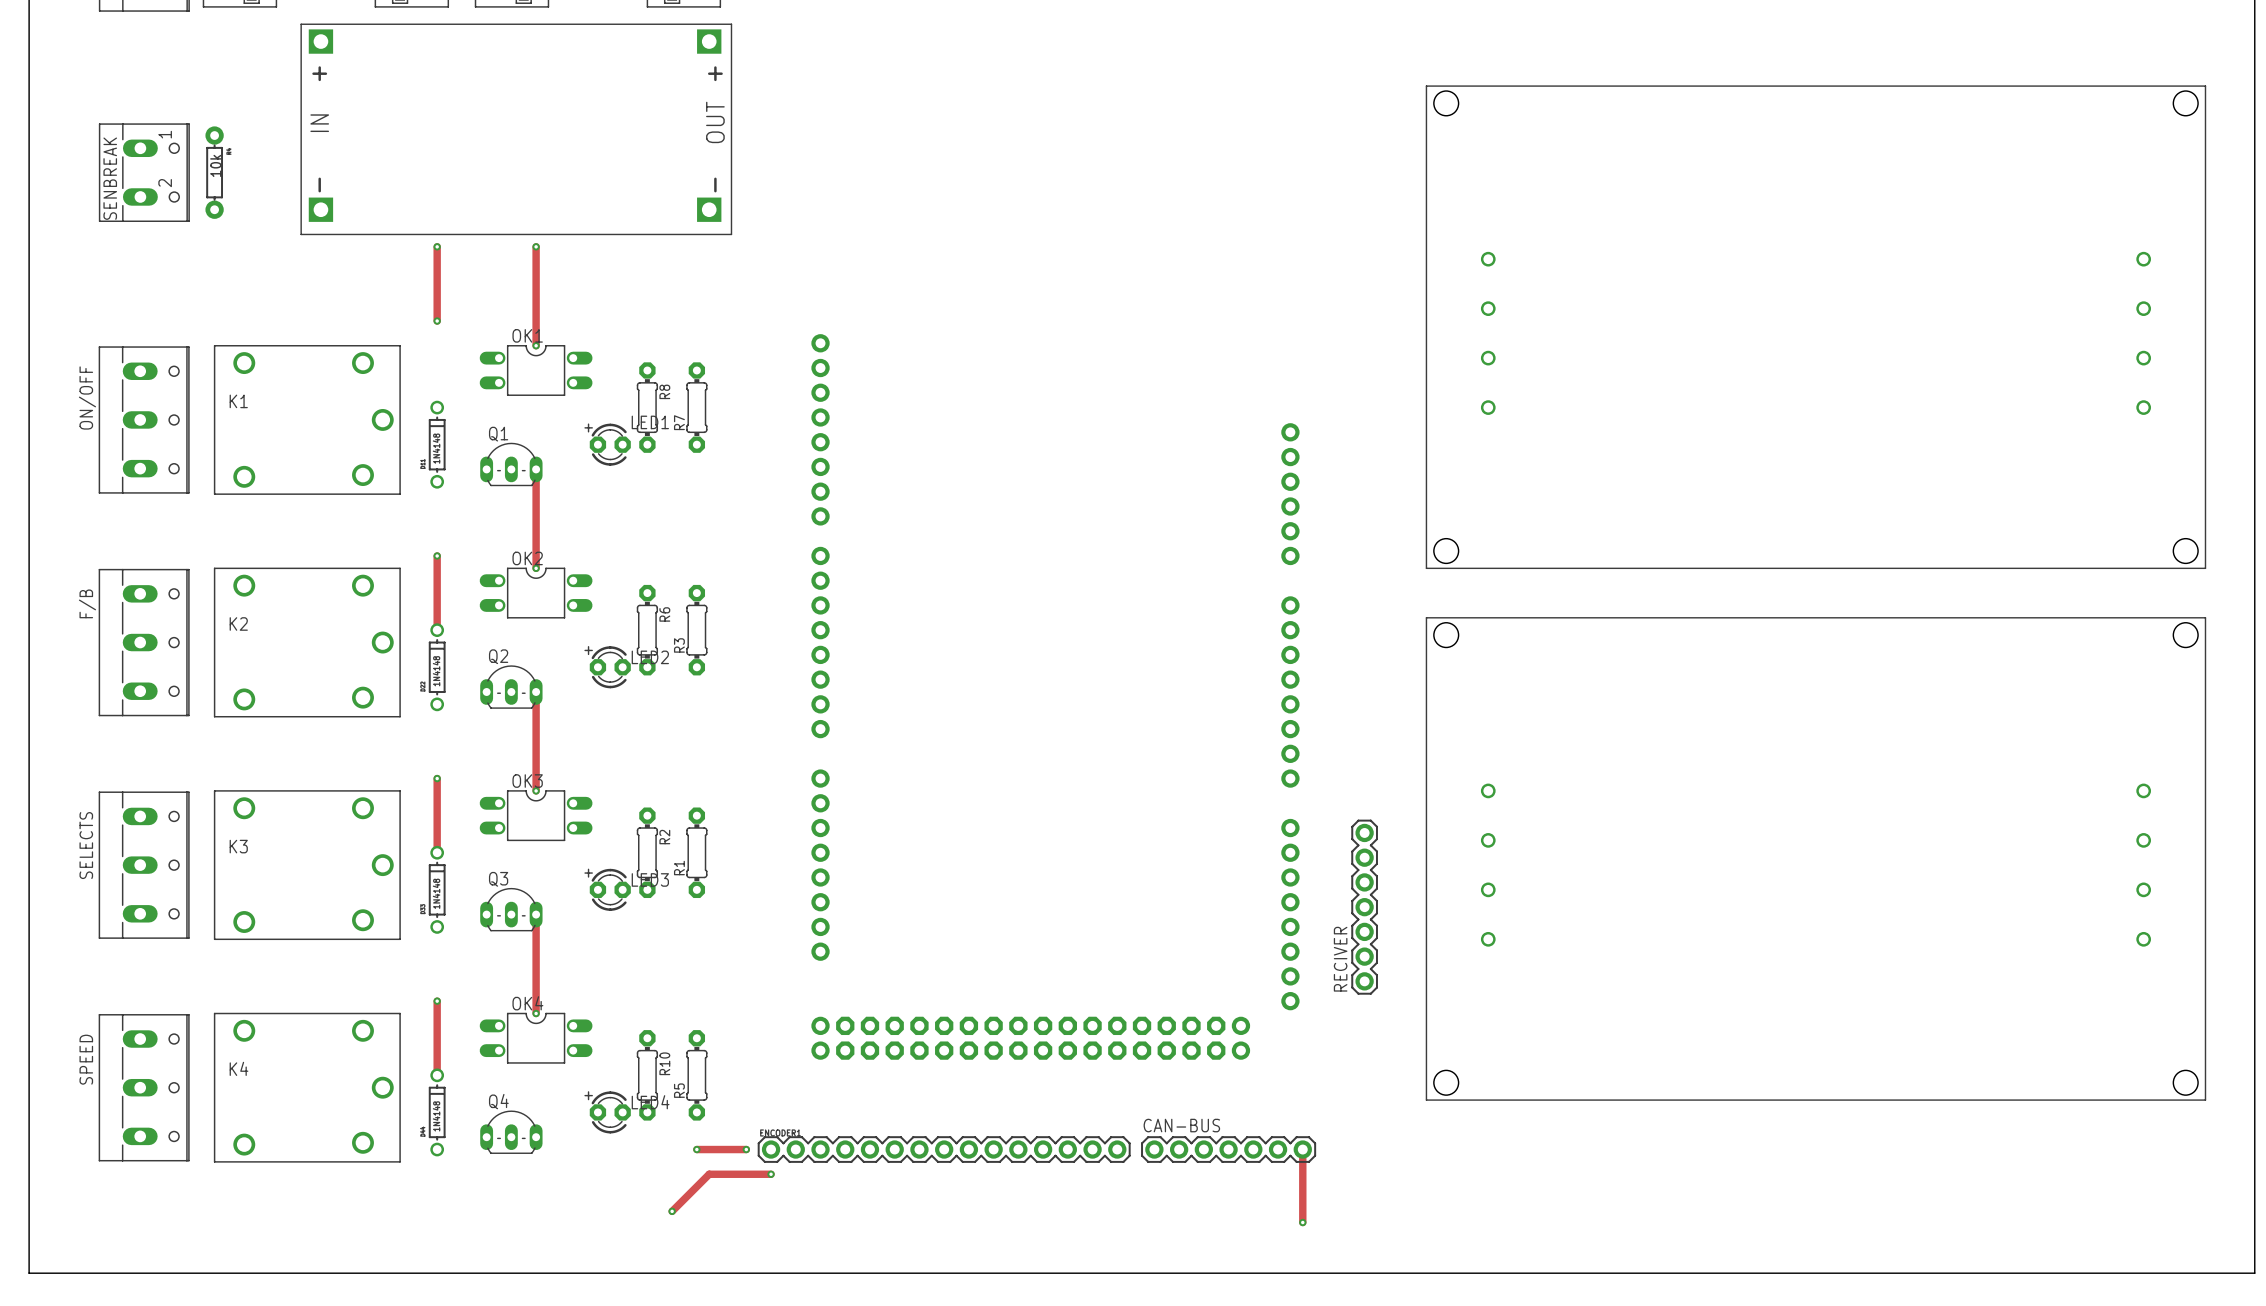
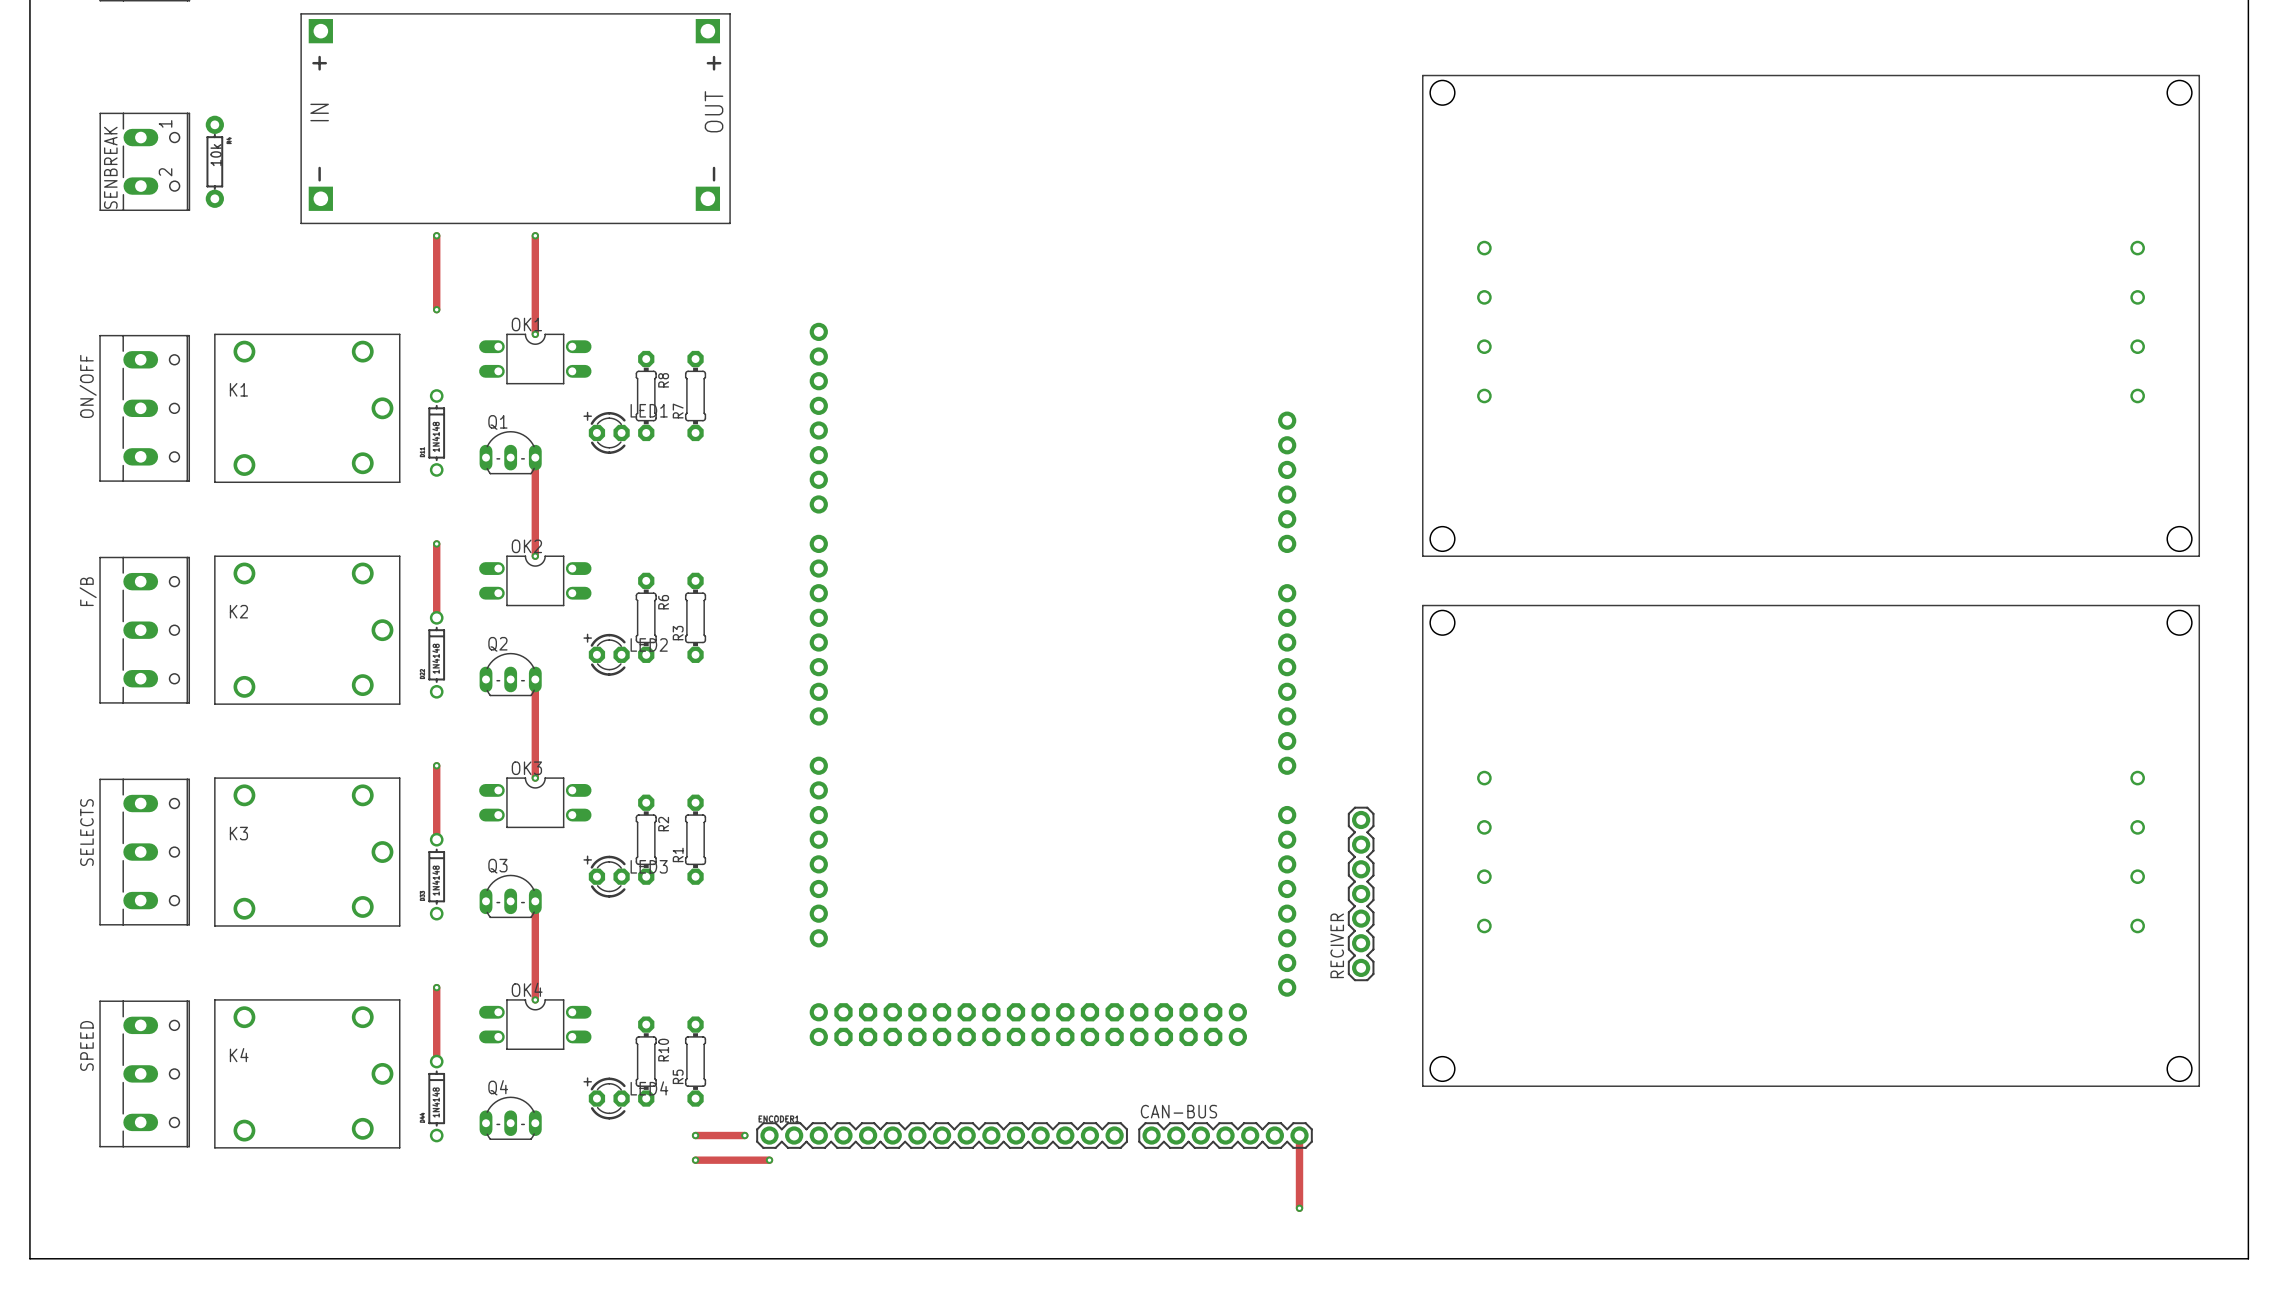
track: (709, 1174) (672, 1211) -> (707, 1160) (695, 1160)
via position: (672, 1211) -> (695, 1160)

